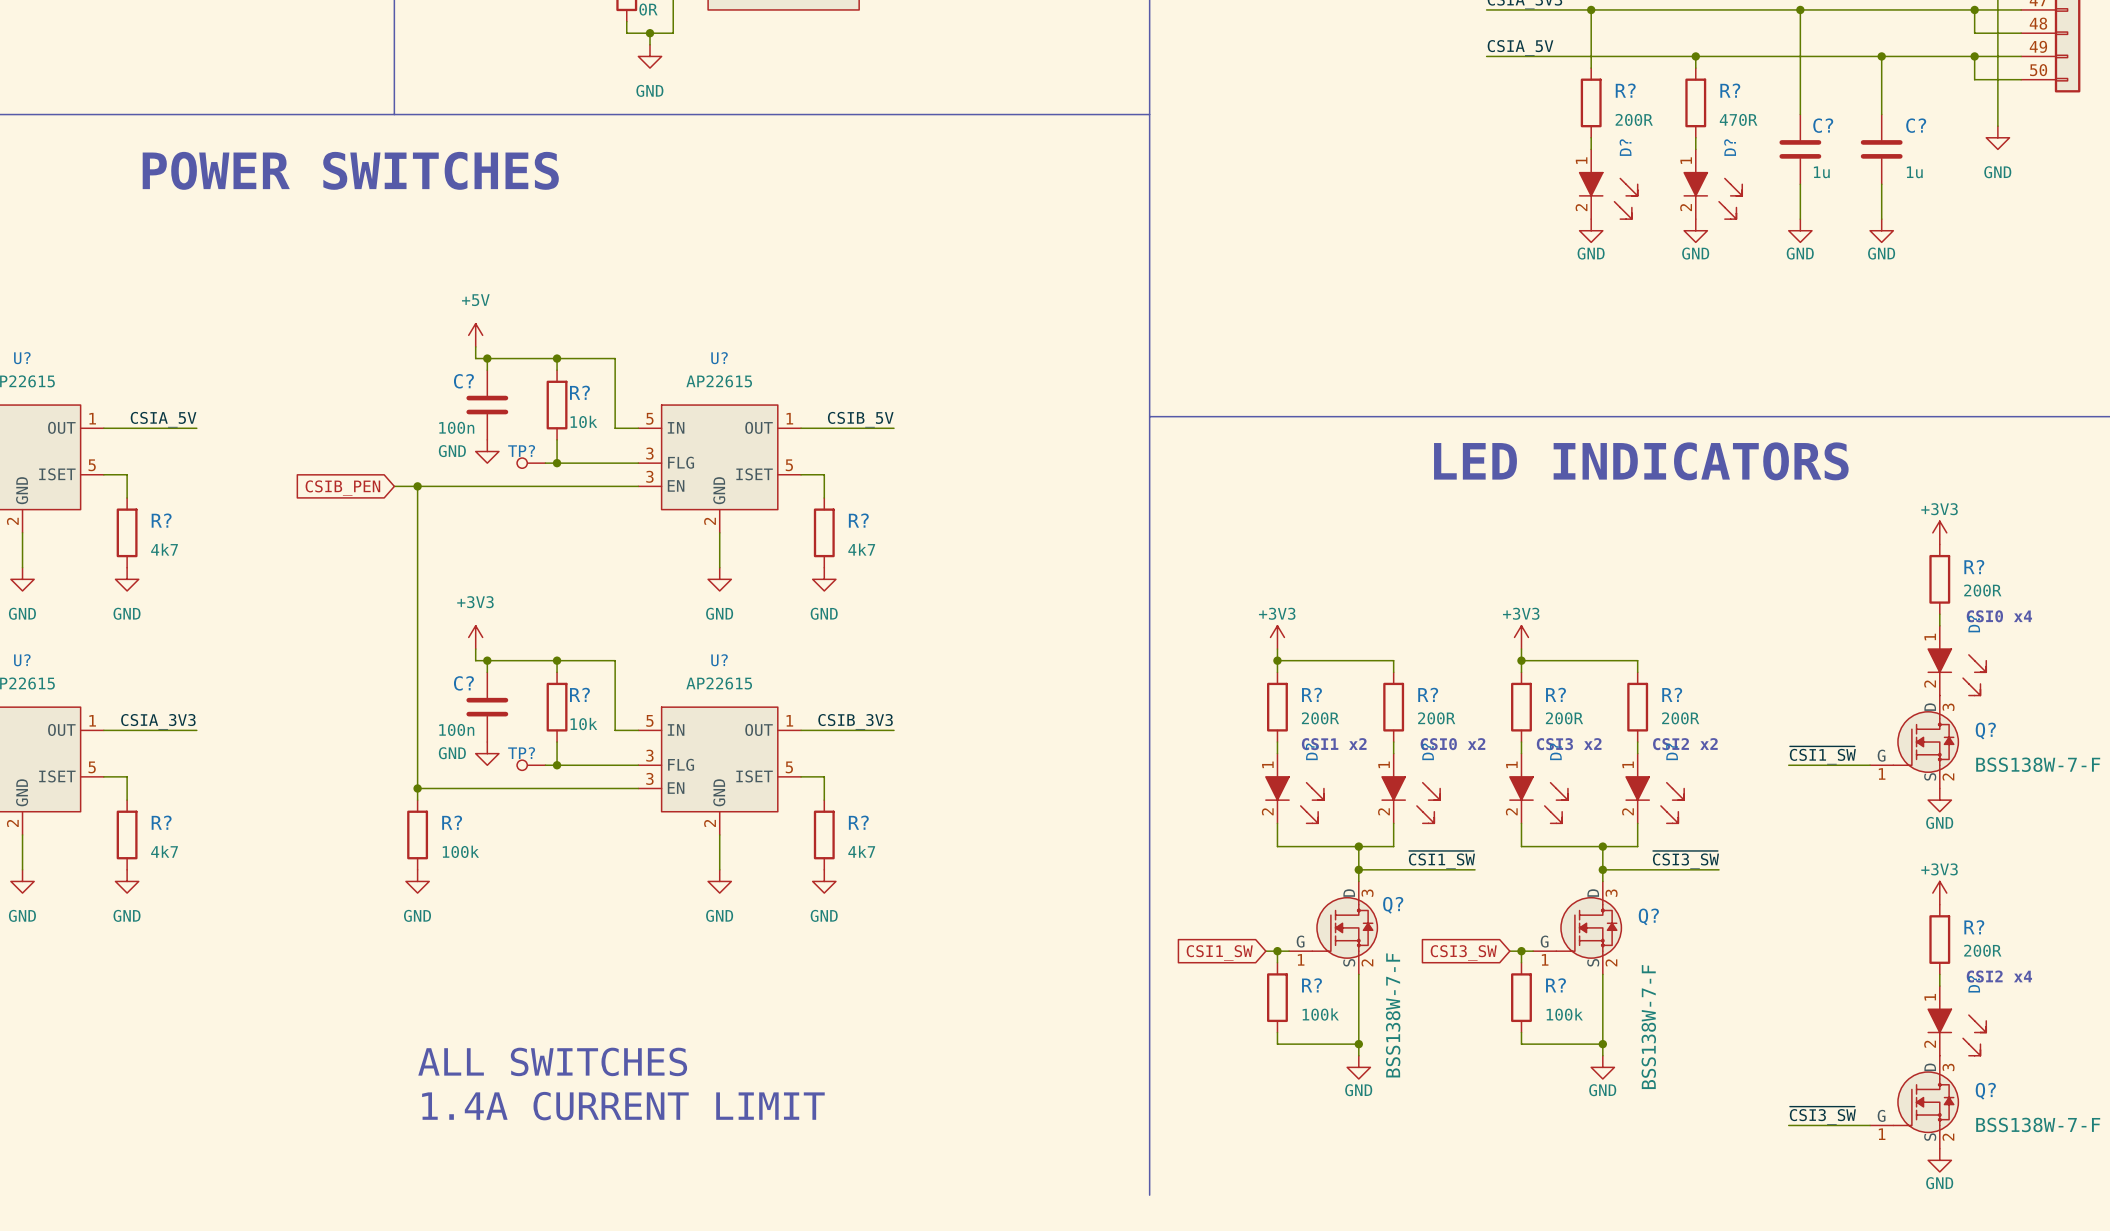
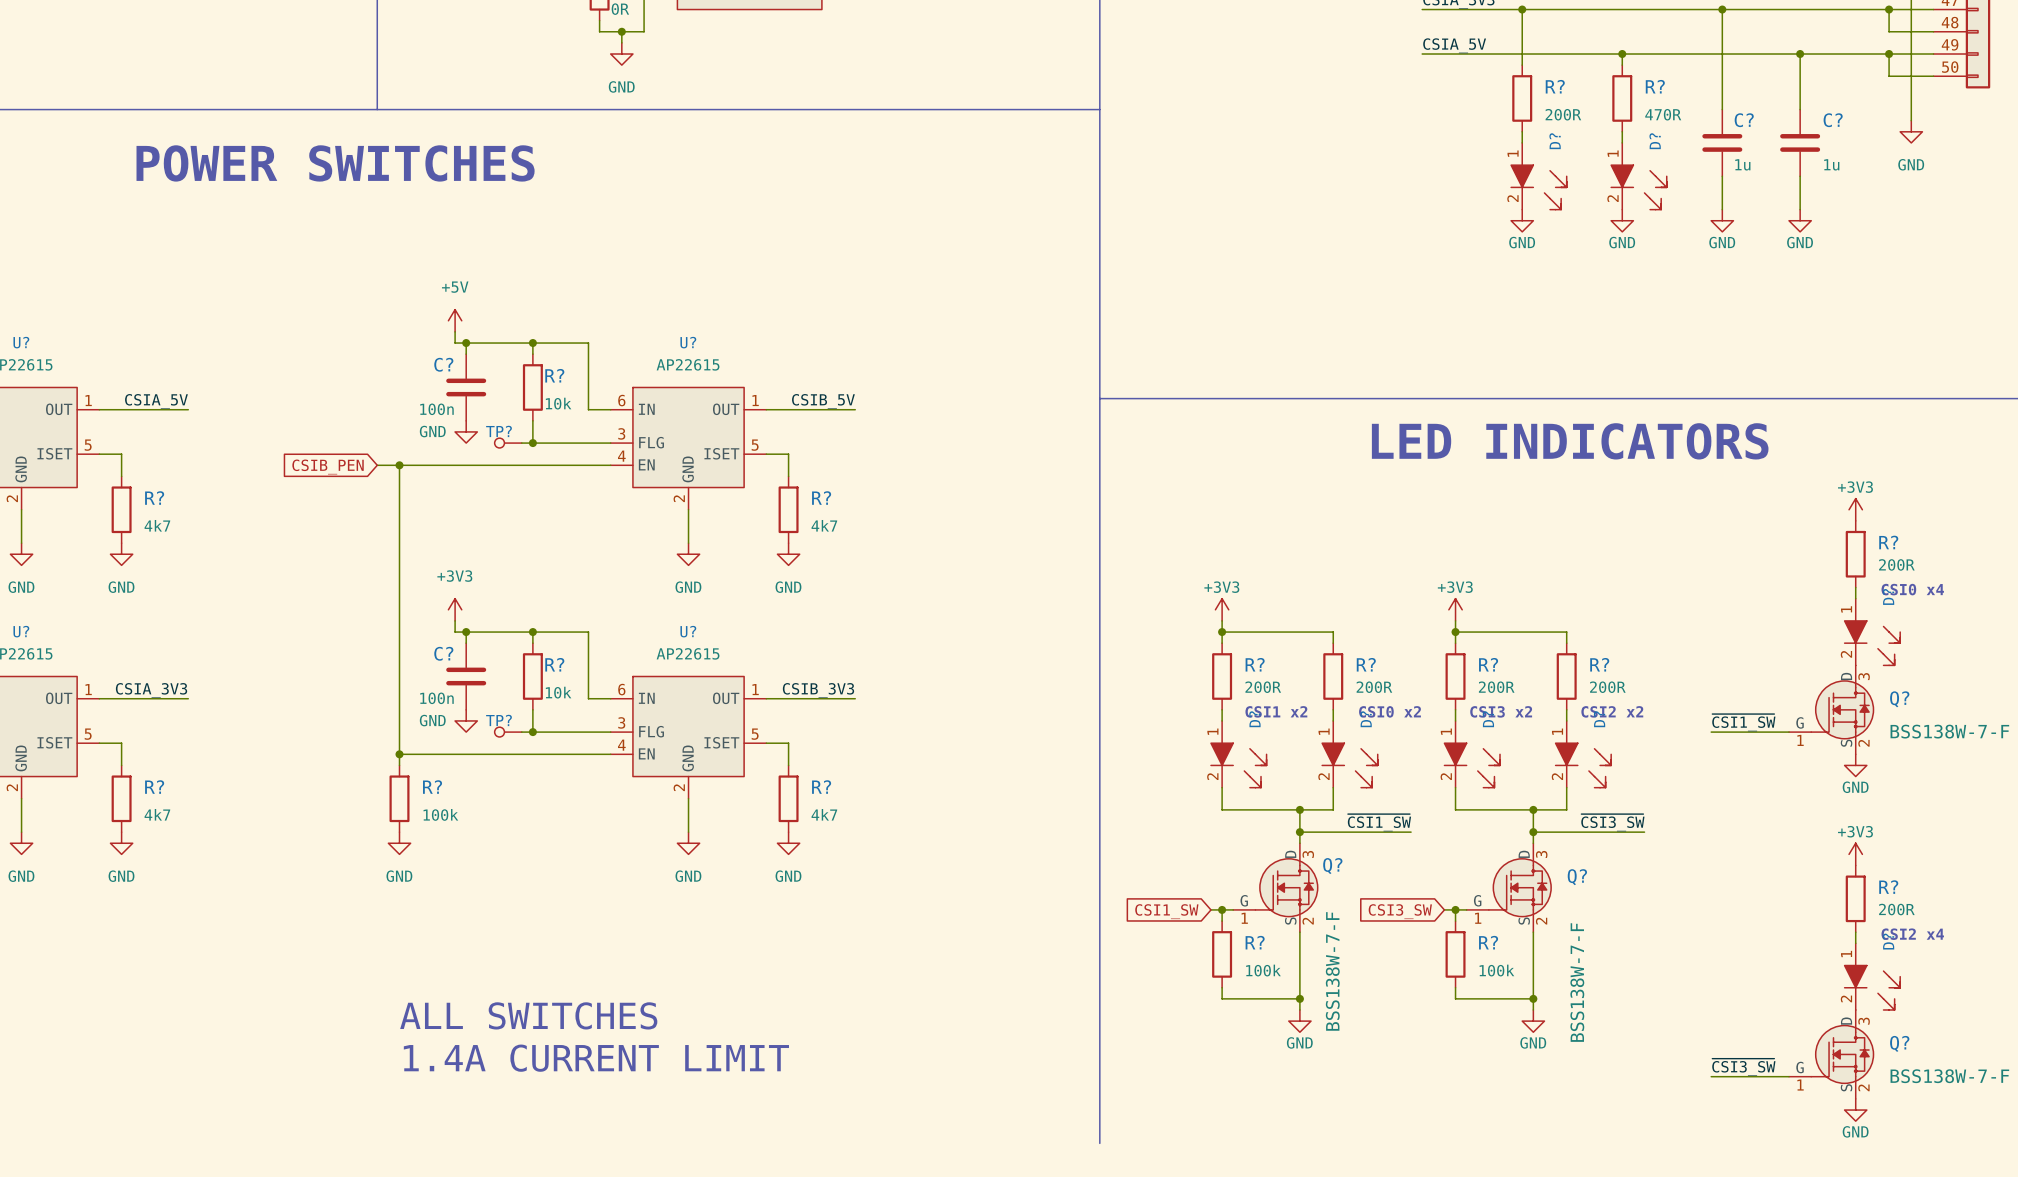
U? pin number: 5 (649, 418) -> 6 (621, 400)
U? pin number: 3 (649, 476) -> 4 (621, 456)
U? pin number: 5 (649, 720) -> 6 (621, 689)
U? pin number: 3 (649, 778) -> 4 (621, 745)

